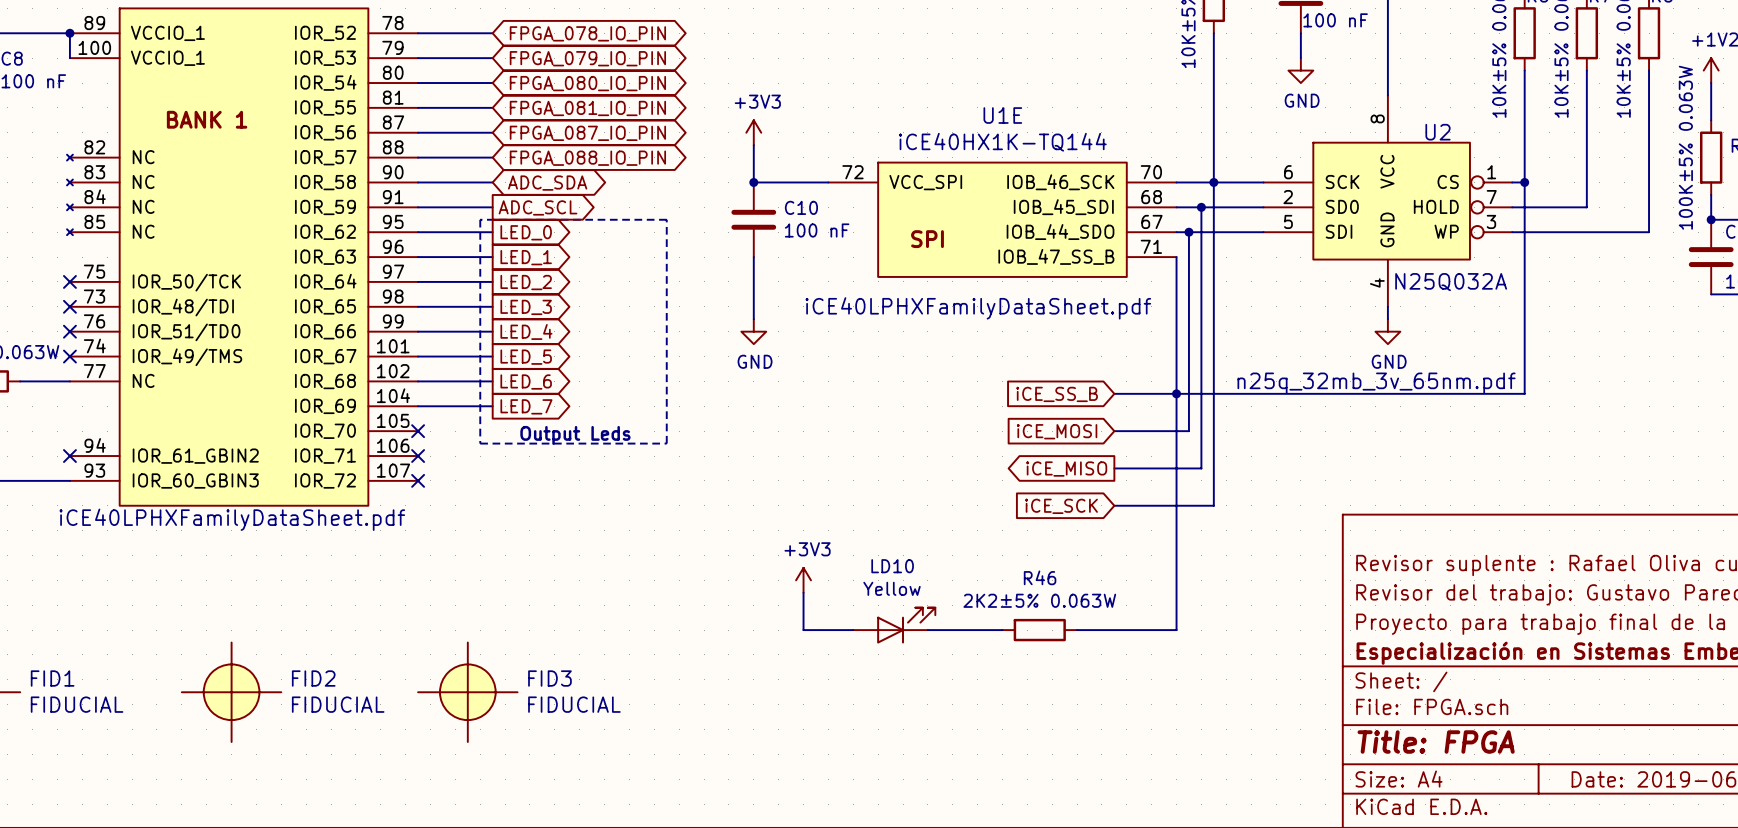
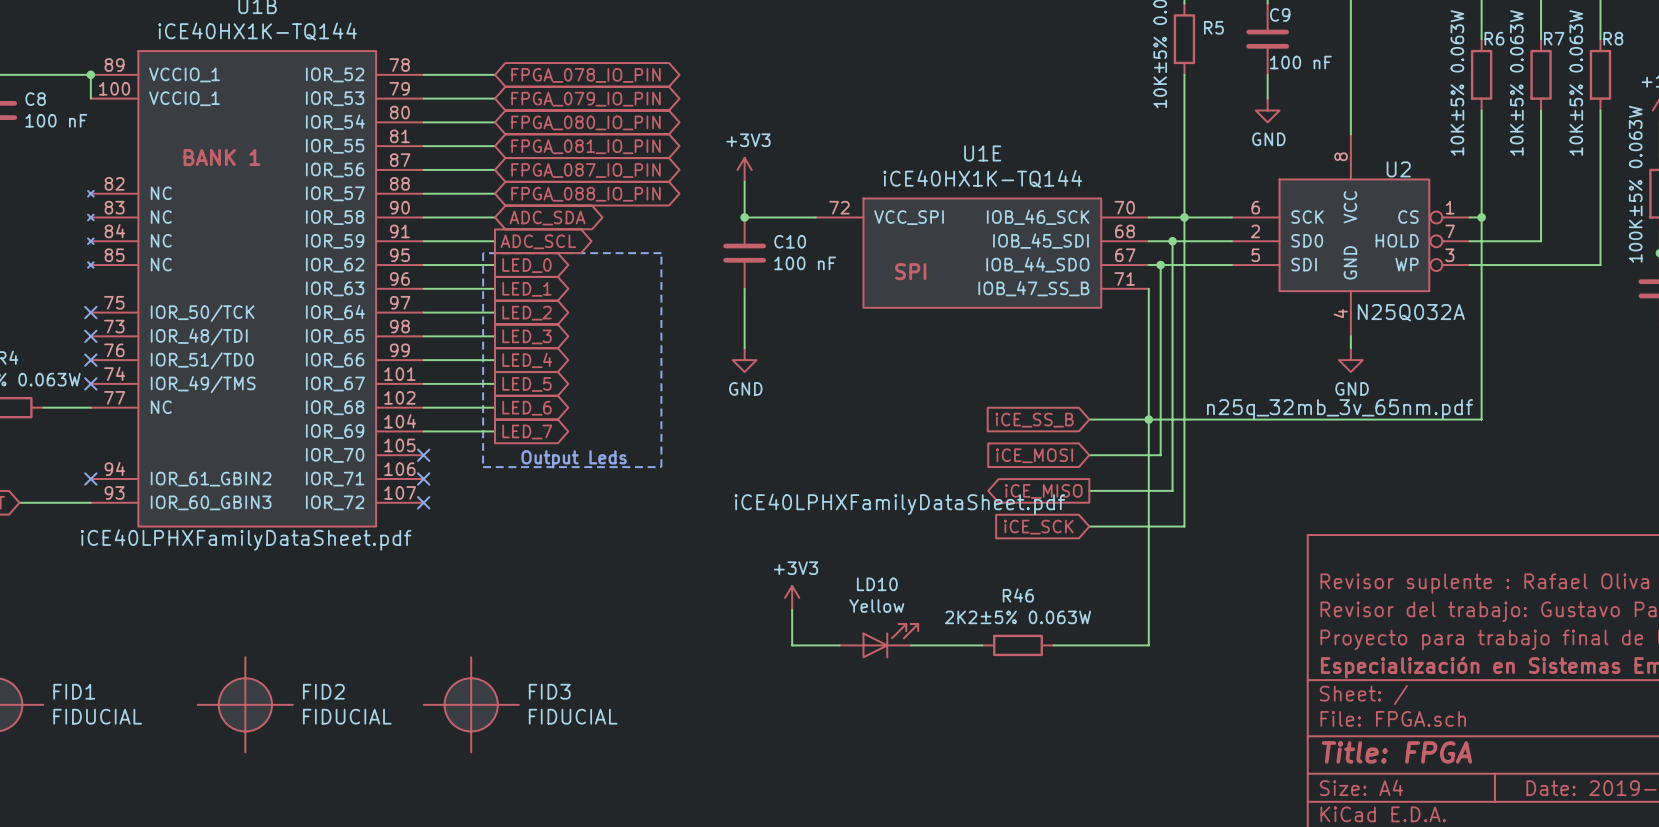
U1E text position: iCE40LPHXFamilyDataSheet.pdf (978, 308) -> iCE40LPHXFamilyDataSheet.pdf (899, 504)

